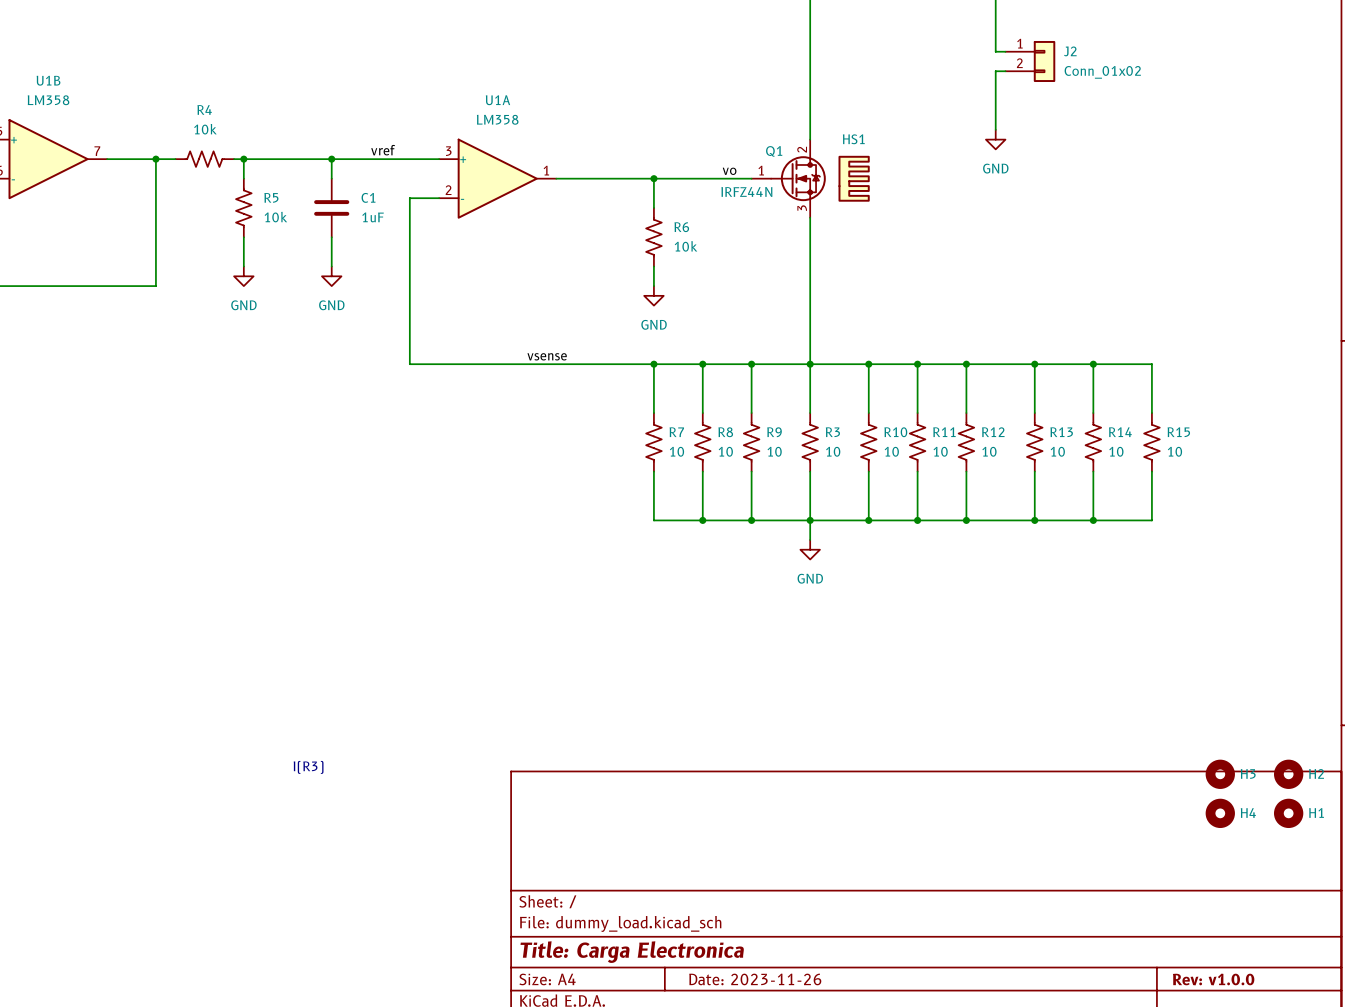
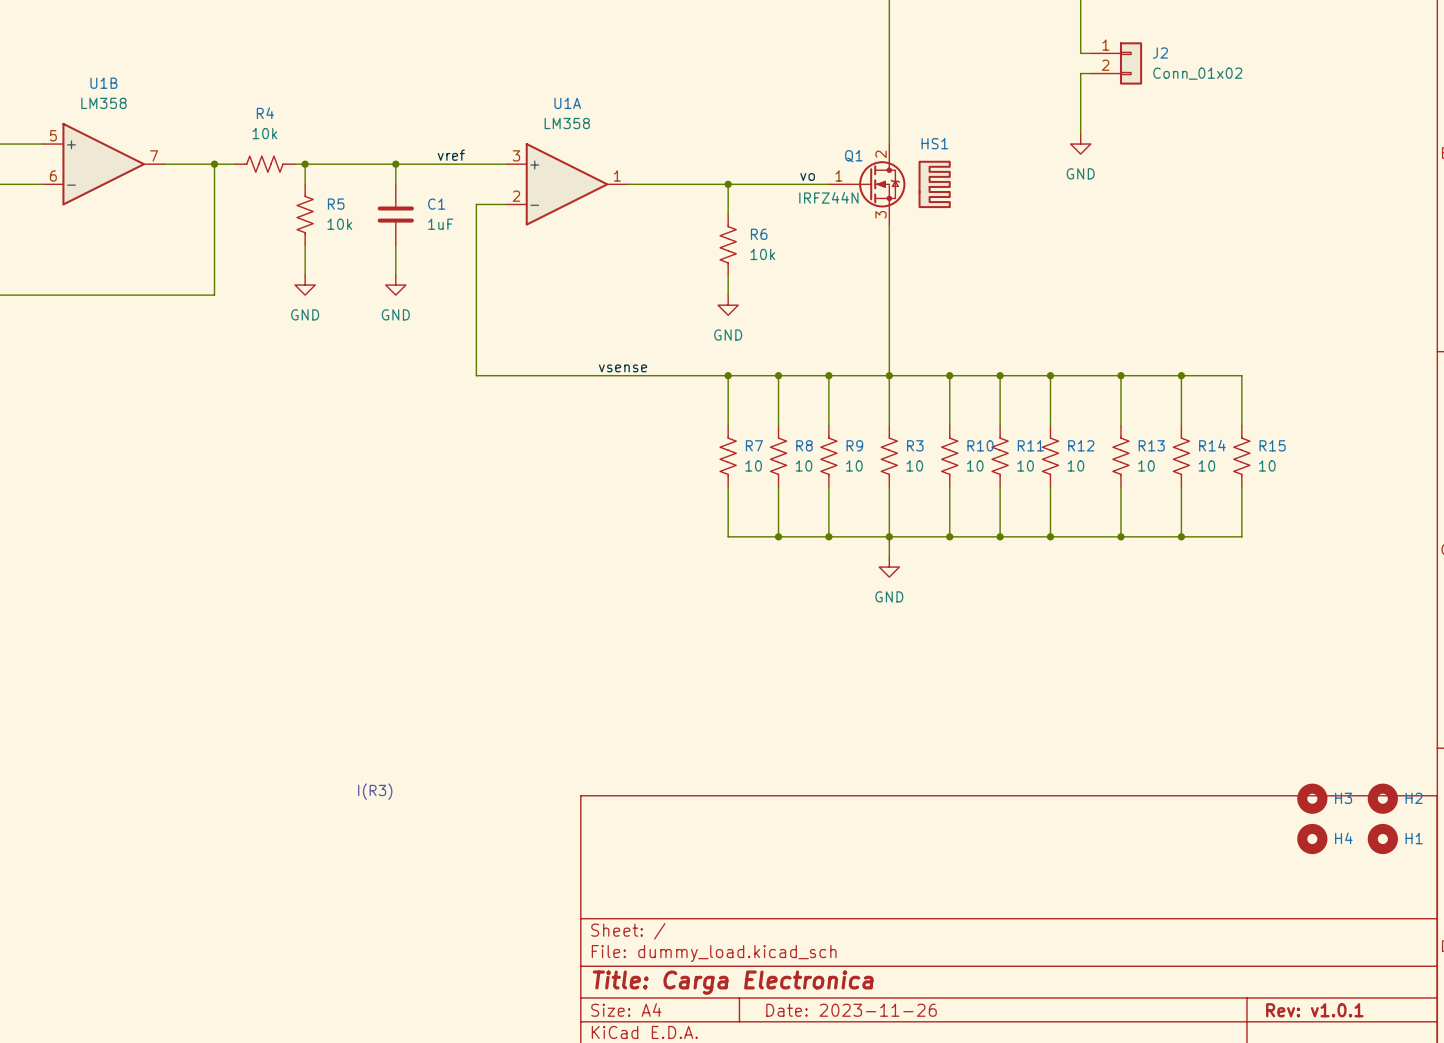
title block: Rev: v1.0.0 (1213, 979) -> Rev: v1.0.1 (1314, 1010)

